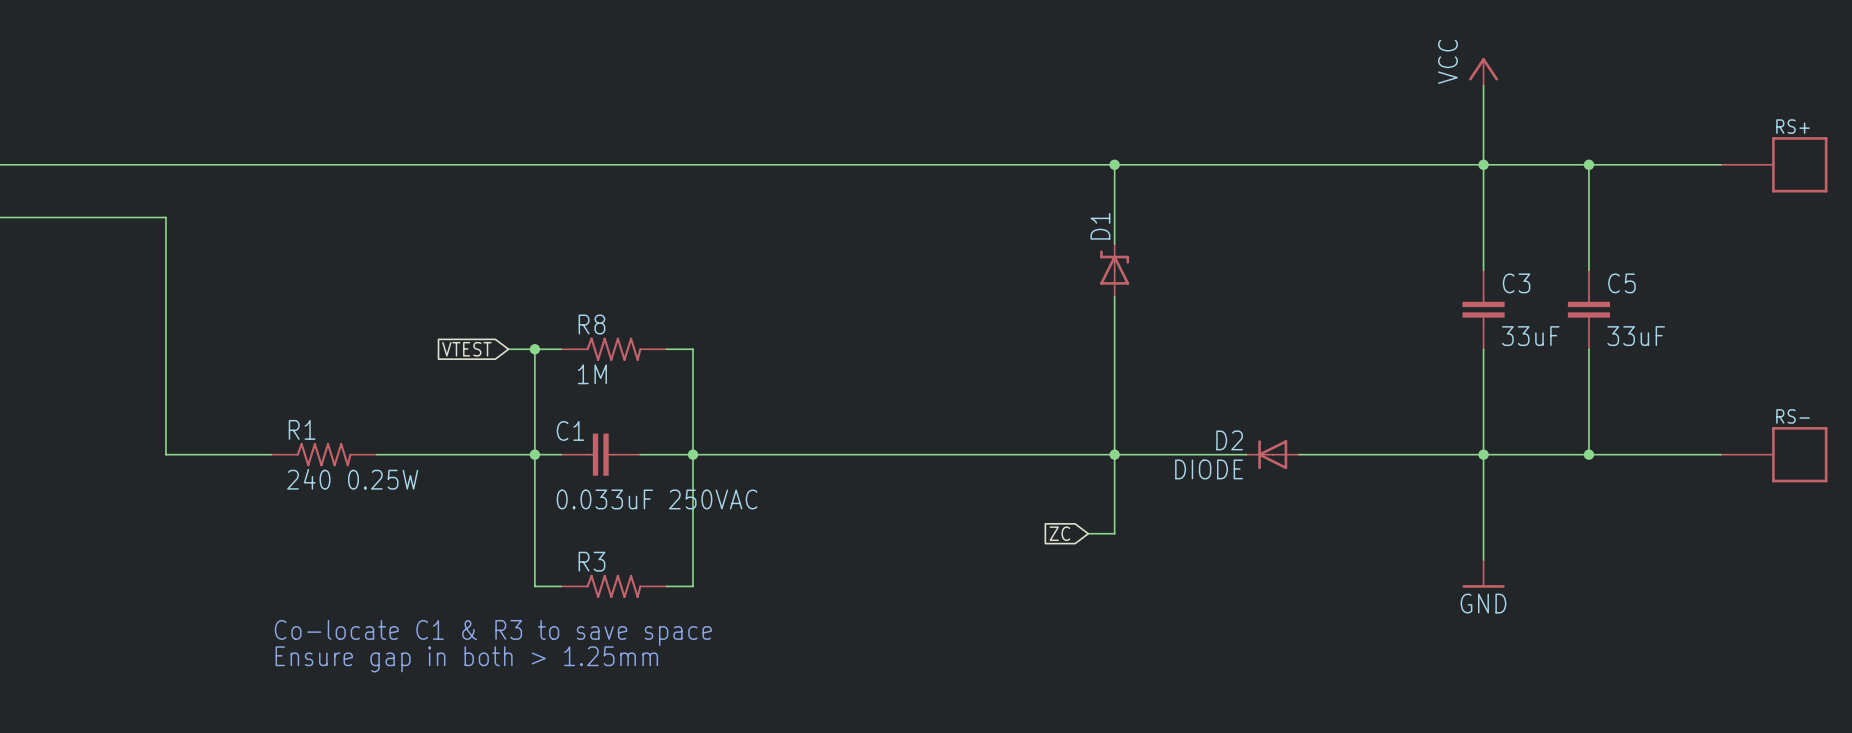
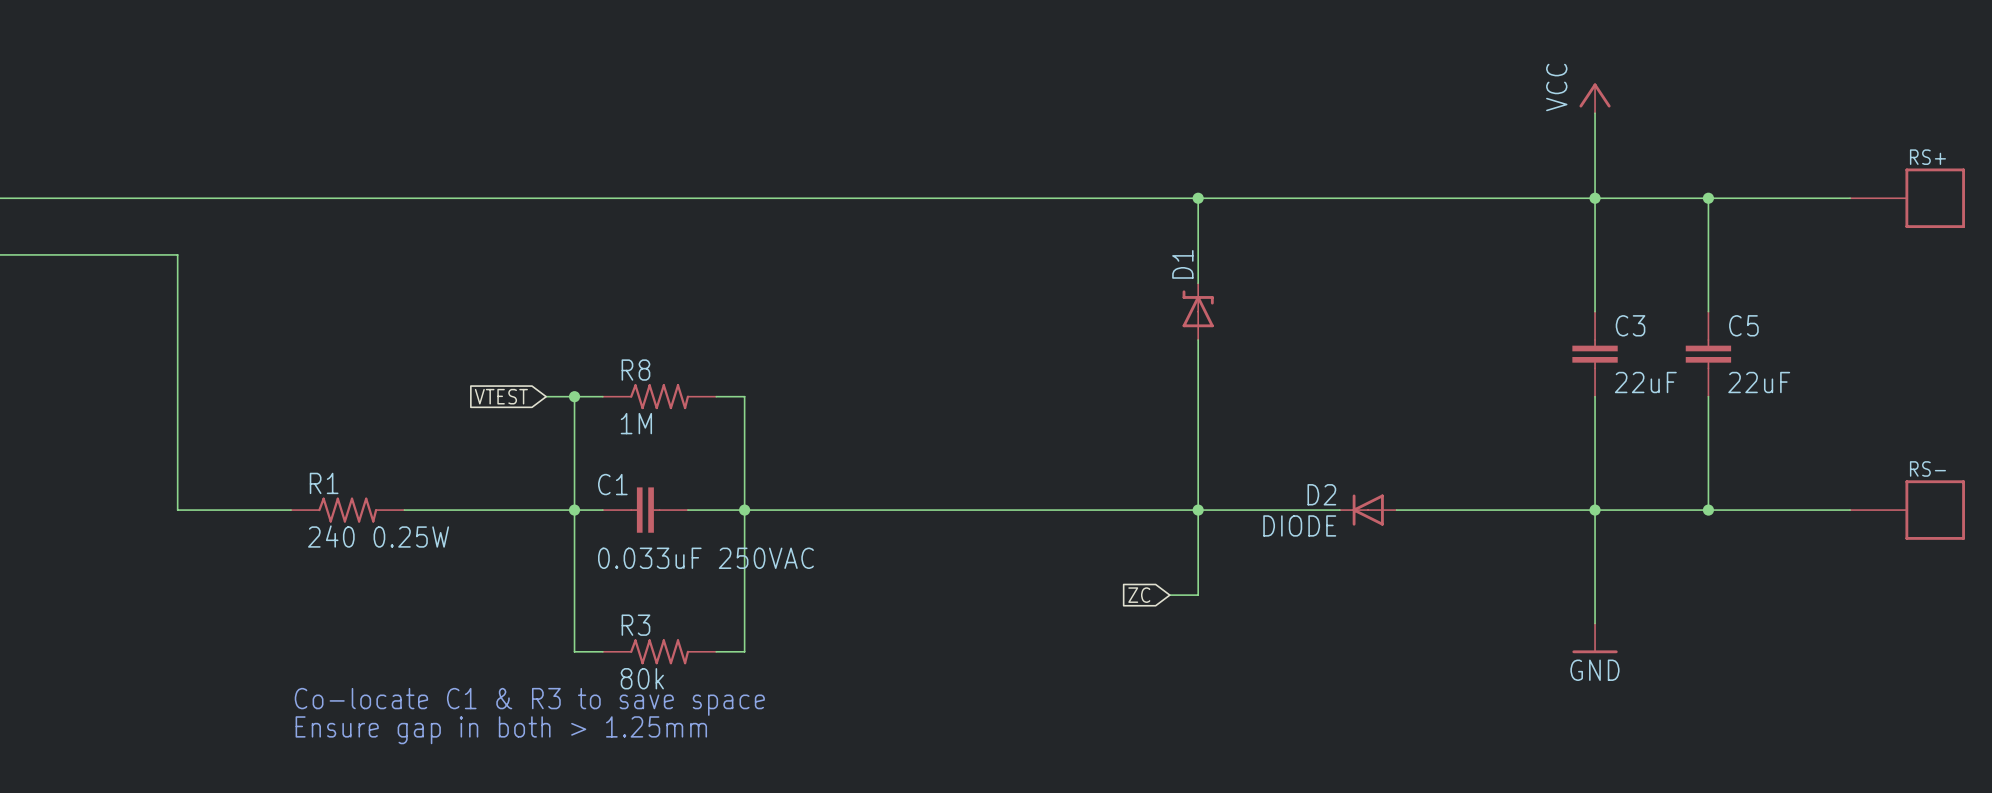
C3 value: 33uF (1530, 336) -> 22uF (1645, 382)
C5 value: 33uF (1636, 336) -> 22uF (1759, 382)
R3 value: none -> 80k (642, 678)

